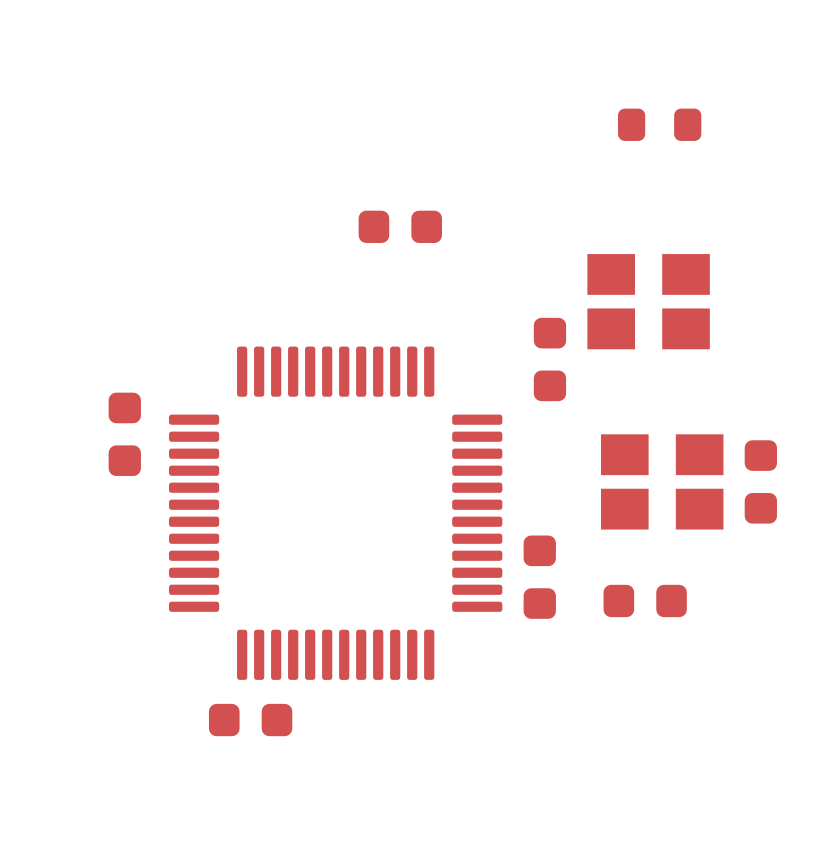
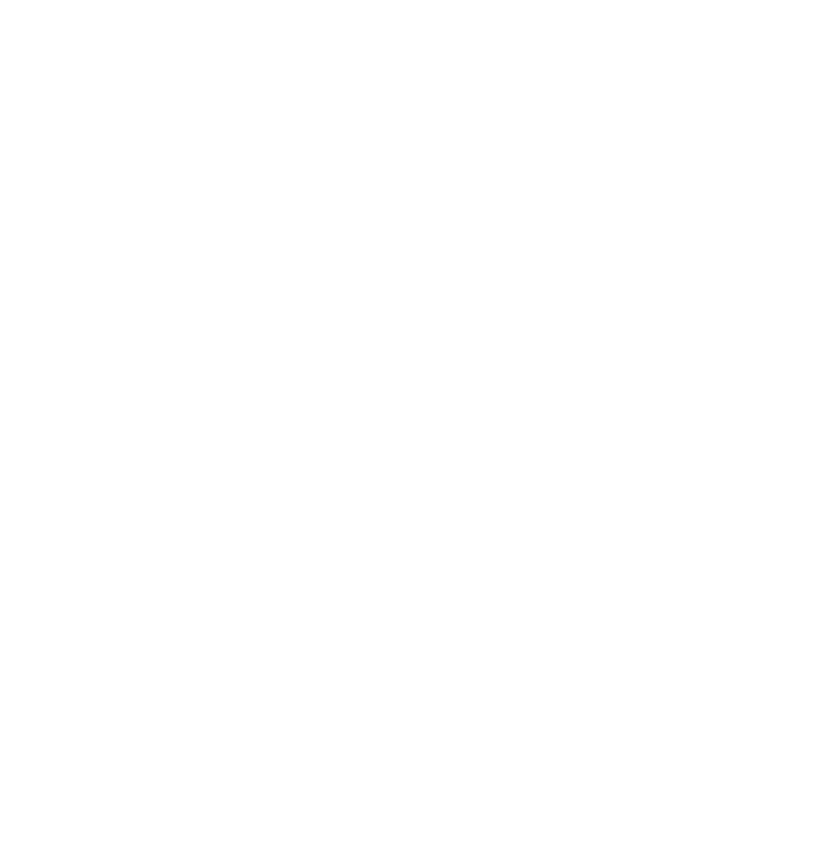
part: (659, 124) -> none
part: (400, 226) -> none
part: (648, 301) -> none
part: (549, 359) -> none
part: (124, 434) -> none
part: (662, 481) -> none
part: (760, 481) -> none
part: (335, 513) -> none
part: (539, 577) -> none
part: (645, 600) -> none
part: (250, 720) -> none

